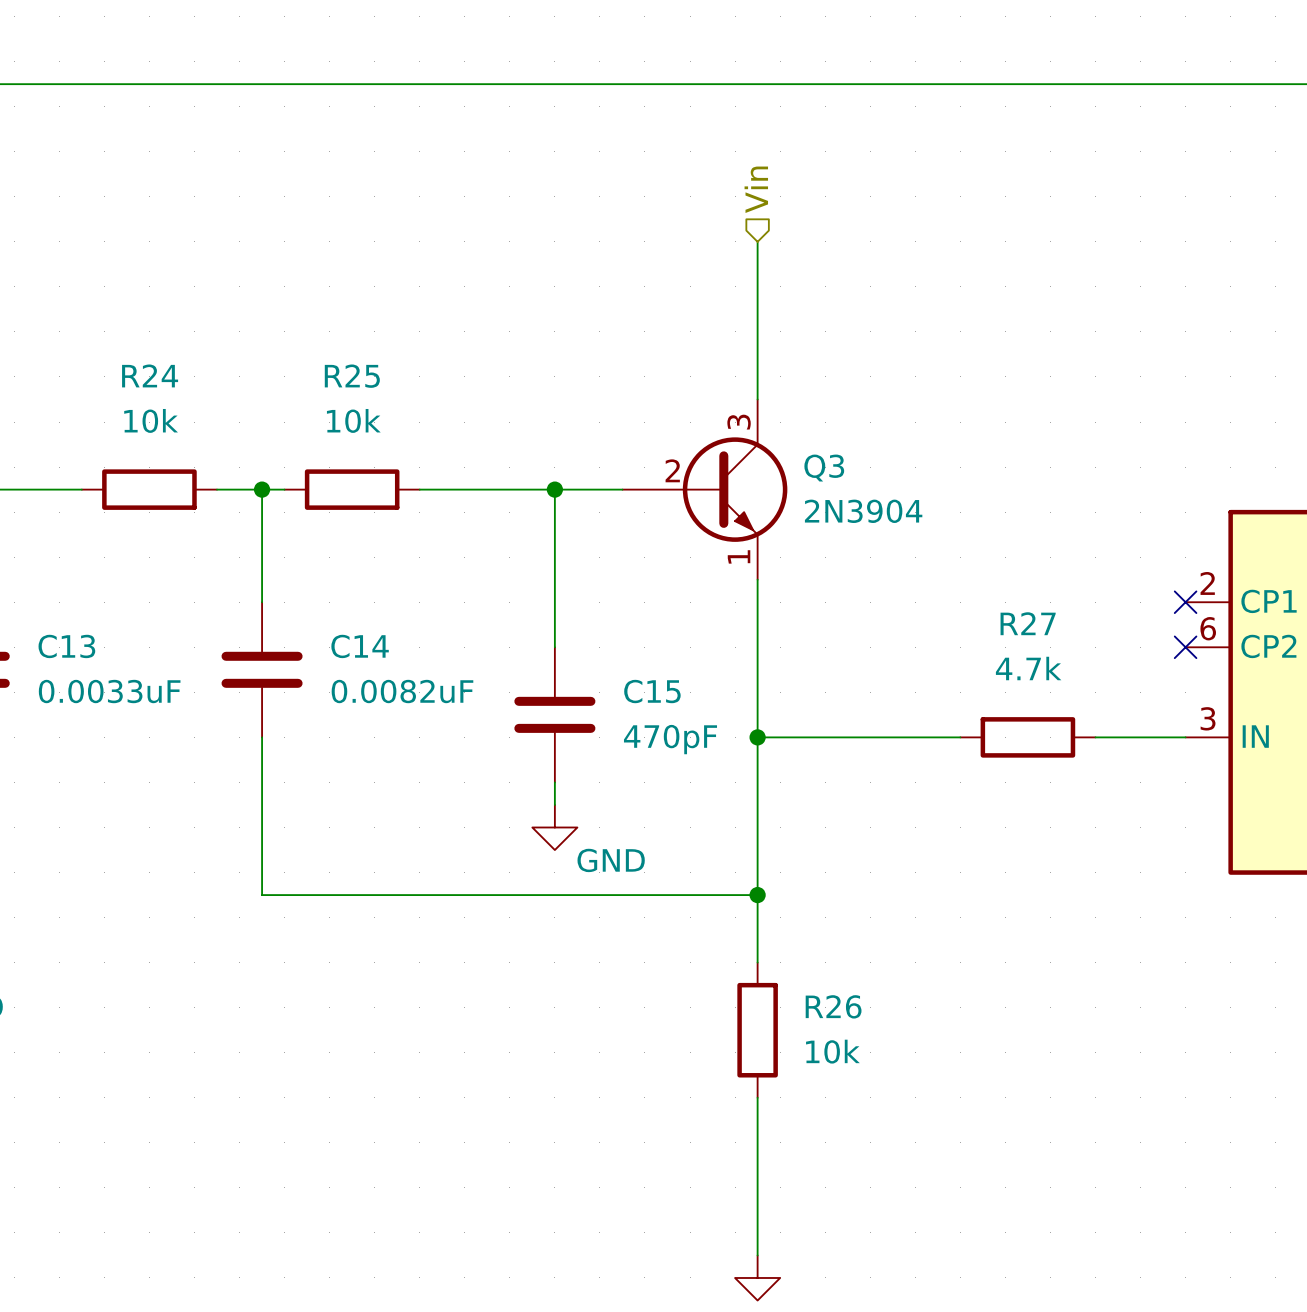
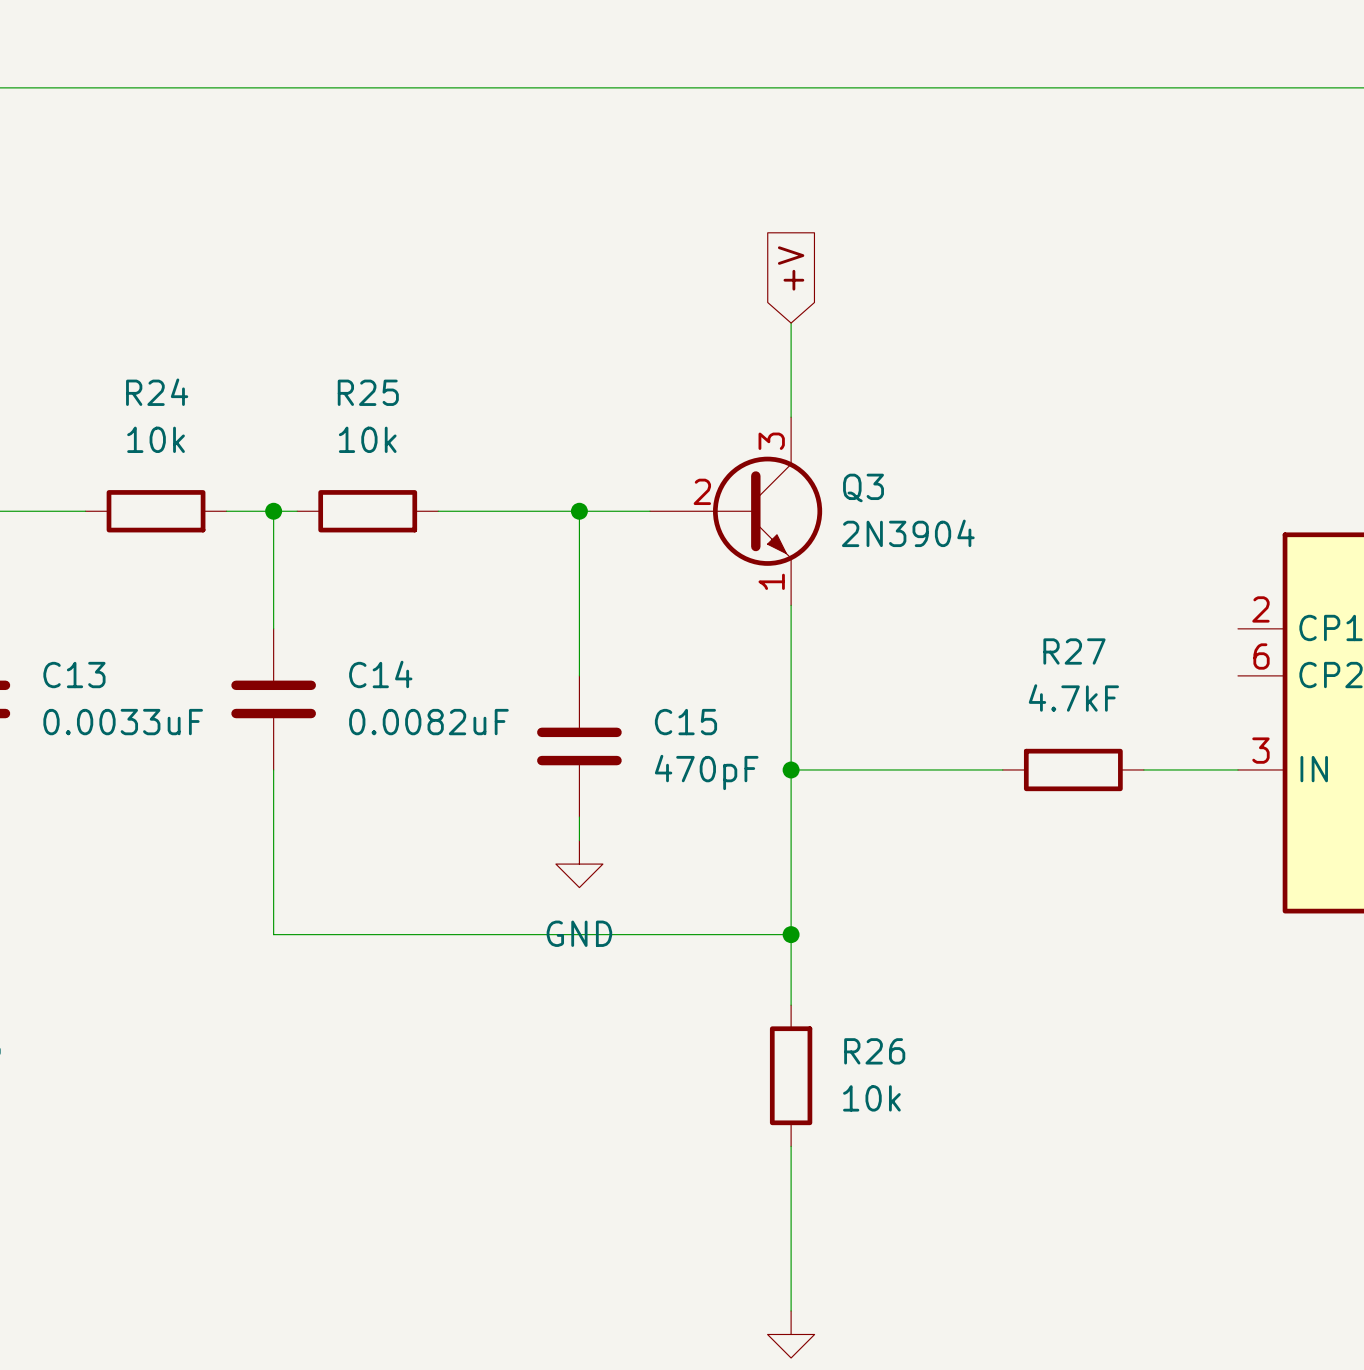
hierarchical label: Vin (756, 189) -> none
wire: (757, 241) (757, 309) -> none
global label: none -> +V (791, 268)
no-connect mark: (1185, 602) -> none
no-connect mark: (1185, 647) -> none
R27 value: 4.7k (1028, 668) -> 4.7kF (1073, 697)
power symbol text position: GND (611, 860) -> GND (579, 933)

